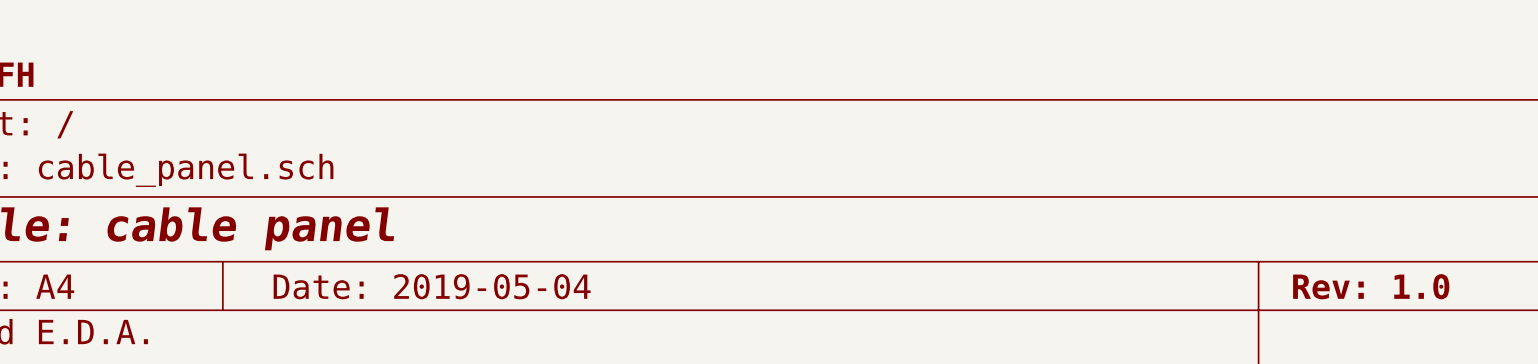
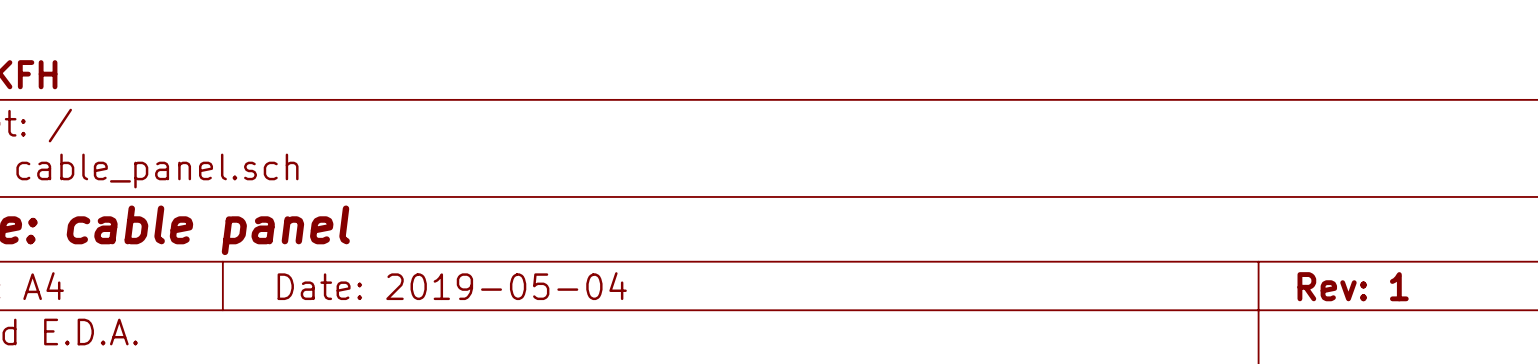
title block: Rev: 1.0 (1371, 286) -> Rev: 1 (1353, 286)

